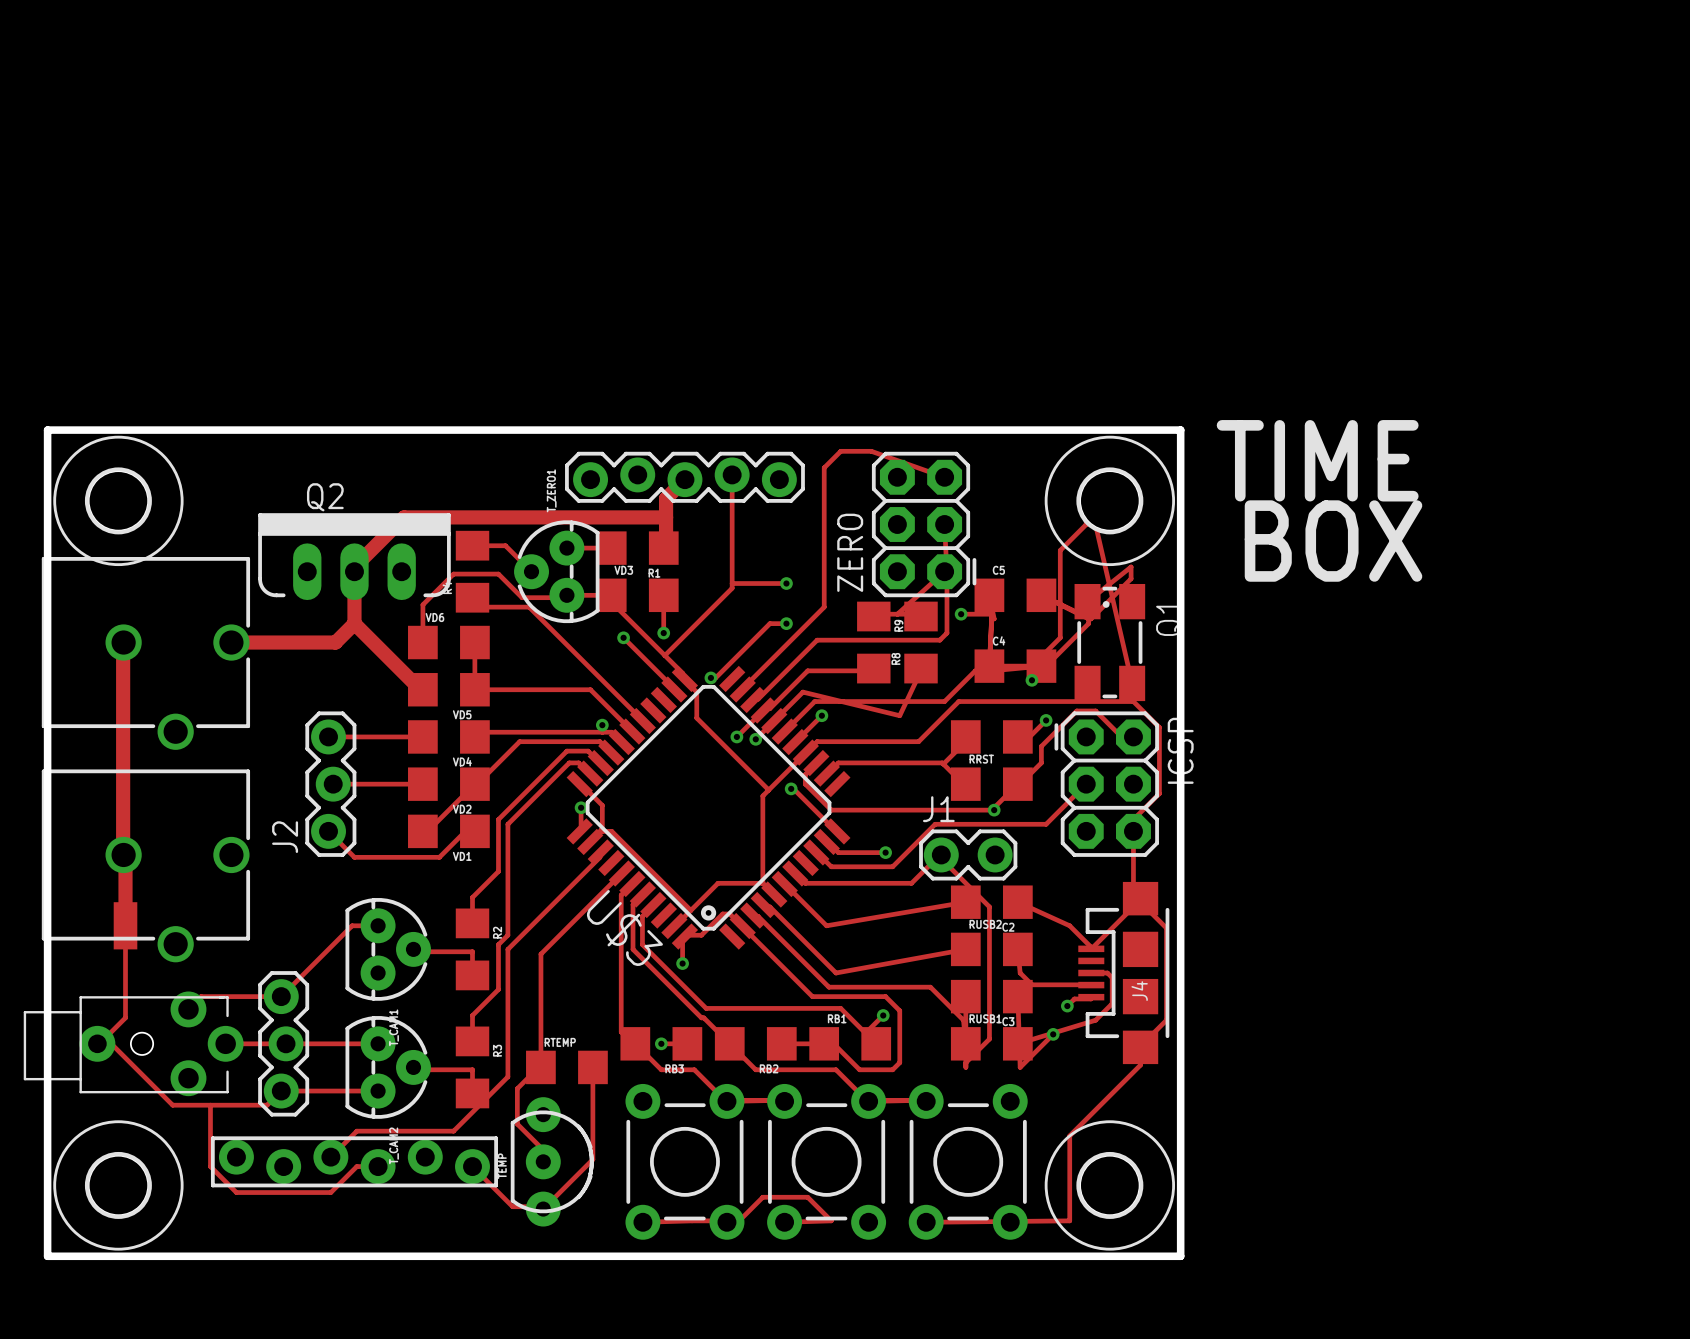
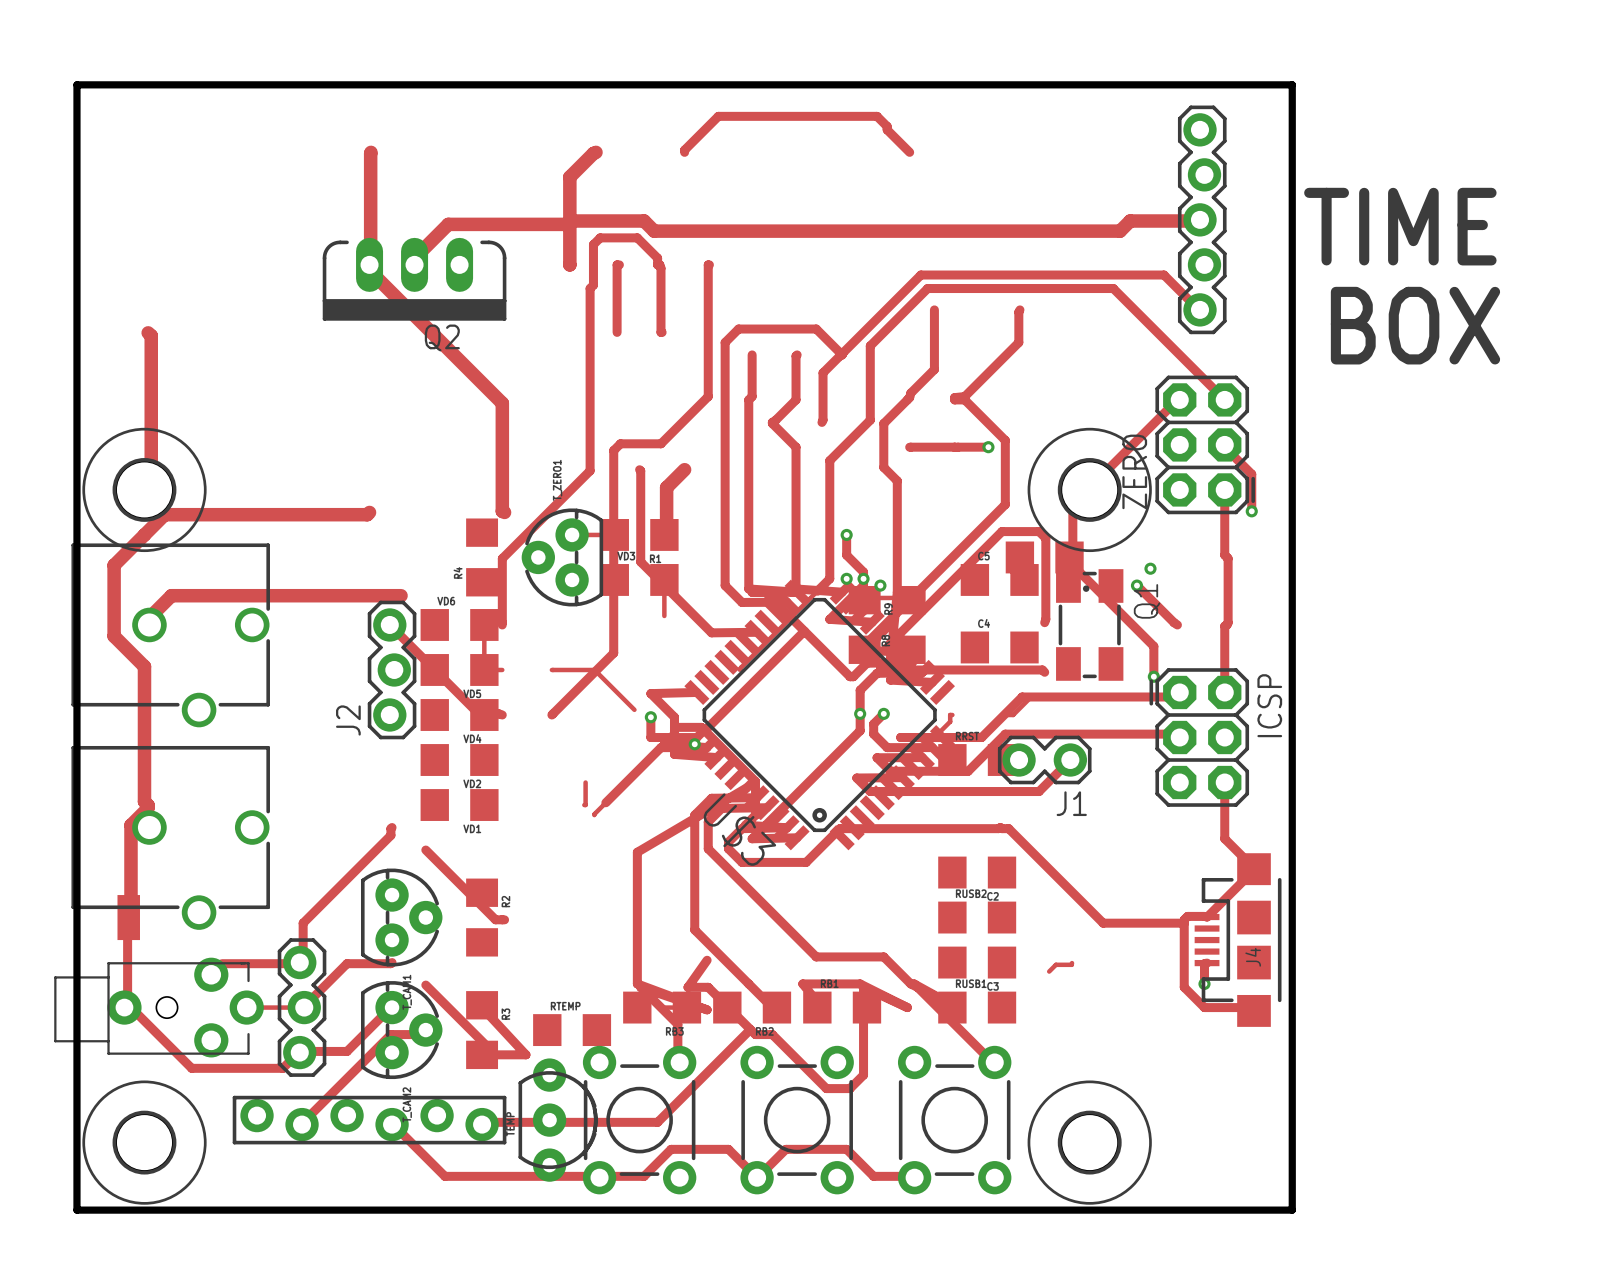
track: none -> (370, 152) (370, 264) (367, 268) (502, 403) (502, 511) (504, 512)
track: none -> (596, 152) (569, 177) (569, 264)
track: none -> (684, 152) (684, 150) (718, 116) (877, 116) (887, 126) (887, 129) (909, 152)
track: none -> (1199, 219) (1130, 221) (1120, 231) (654, 231) (644, 221) (569, 221)
part: none -> (1202, 219)
track: none -> (569, 224) (448, 224) (414, 258) (414, 264)
track: none -> (619, 264) (617, 264) (617, 332)
track: none -> (709, 264) (708, 396) (660, 443) (620, 443) (613, 450) (613, 653) (551, 714)
track: none -> (934, 309) (934, 369) (883, 423) (883, 467) (897, 480) (897, 592) (892, 642)
track: none -> (1019, 309) (1018, 342) (964, 396) (954, 397) (954, 399) (964, 399) (1005, 440) (1005, 504) (860, 649) (902, 652)
track: none -> (1199, 309) (1163, 275) (920, 275) (842, 354)
track: none -> (662, 332) (660, 268) (659, 264) (657, 264) (657, 258) (637, 237) (600, 237) (593, 244) (593, 285) (590, 288) (590, 470) (502, 558) (502, 624)
track: none -> (148, 332) (151, 335) (151, 501) (164, 514)
track: none -> (752, 354) (752, 396) (748, 399) (748, 588) (797, 592) (752, 592) (765, 592) (850, 676) (853, 676) (866, 663) (912, 662)
track: none -> (797, 354) (796, 399) (772, 422) (796, 447) (796, 588) (842, 592)
track: none -> (842, 354) (816, 329) (738, 329) (725, 342) (725, 585) (742, 602) (787, 602)
track: none -> (842, 354) (823, 372) (821, 422)
track: none -> (1179, 399) (1177, 399) (1072, 504) (1072, 555) (1069, 557) (1069, 561) (1153, 646) (1153, 676)
board edge: (47, 430) (1180, 430) (1180, 1256) -> (76, 422) (76, 84) (1292, 84) (1292, 1210) (1157, 1210)
track: none -> (1224, 444) (1224, 447) (1251, 474) (1251, 511)
track: none -> (909, 447) (988, 447)
via: none -> (988, 447)
text position: TIME (1317, 460) -> TIME (1400, 226)
track: (732, 474) (732, 588) (664, 655) -> none
part: (684, 477) -> none
track: (944, 477) (871, 451) (840, 451) (824, 467) (824, 607) -> (1224, 399) (1113, 288) (927, 288) (870, 345) (870, 420) (829, 460) (829, 578) (817, 591)
track: none -> (639, 469) (640, 561) (711, 632) (757, 632)
track: none -> (1224, 489) (1224, 555) (1228, 558) (1228, 622) (1224, 626) (1224, 692)
track: (666, 517) (404, 517) (354, 566) (354, 623) -> none
via: none -> (1251, 511)
track: none -> (369, 512) (367, 514) (164, 514)
ZERO position: (924, 524) -> (1205, 444)
track: (944, 524) (946, 633) (939, 640) (817, 640) (758, 699) (753, 699) -> none
track: none -> (164, 514) (114, 565) (114, 636) (144, 666) (144, 801) (148, 805) (147, 808) (130, 825) (130, 906) (128, 906)
text position: BOX (1333, 541) -> BOX (1415, 325)
track: (472, 545) (505, 545) (531, 571) -> none
track: none -> (846, 534) (846, 555) (863, 572) (863, 585) (829, 619) (872, 622)
via: none -> (846, 534)
Q2 rotation: 0° (354, 556) -> 180° (414, 279)
Q2 position: (354, 556) -> (414, 279)
track: (944, 571) (897, 614) -> none
track: (732, 583) (786, 583) -> none
via: (786, 583) -> none
via: none -> (1150, 568)
via: none -> (846, 578)
via: none -> (863, 578)
track: (989, 595) (994, 618) (991, 616) (989, 666) (991, 614) (961, 614) -> none
track: (472, 597) (479, 607) (529, 607) (642, 721) -> none
via: none -> (880, 585)
track: (1087, 601) (1131, 566) (1131, 578) (1090, 618) (1041, 595) (1088, 618) (1088, 623) (1031, 680) -> none
track: none -> (1136, 585) (1177, 624)
via: none -> (1136, 585)
track: none -> (401, 595) (171, 595) (144, 623)
via: (961, 614) -> none
track: (354, 623) (420, 689) (422, 689) -> none
track: (354, 623) (335, 642) (231, 642) -> none
track: (786, 623) (769, 623) (715, 677) (710, 677) -> none
via: (786, 623) -> none
via: (663, 633) -> none
track: (623, 637) (674, 689) -> none
via: (623, 637) -> none
track: none -> (1044, 622) (1045, 538) (1039, 531) (1001, 531) (890, 642) (890, 659) (880, 669) (922, 672) (877, 673) (860, 690) (860, 730) (752, 838) (797, 837)
track: (123, 642) (123, 850) (123, 854) (125, 854) (125, 913) -> none
track: none -> (389, 624) (478, 713) (502, 714)
track: (422, 642) (422, 604) (453, 574) (498, 574) (522, 597) (611, 595) (611, 602) (682, 673) (682, 677) (696, 692) (696, 718) (768, 790) -> none
track: none -> (804, 631) (704, 730)
track: (873, 668) (873, 670) (807, 670) (769, 708) (765, 708) (736, 736) -> none
track: (921, 668) (899, 715) (802, 692) (755, 739) -> none
via: (710, 677) -> none
via: (1031, 680) -> none
track: (1132, 683) (1086, 484) (1086, 524) (1060, 550) (1060, 637) (1031, 666) (994, 666) (991, 668) (1041, 666) (975, 670) (944, 701) (814, 701) (784, 731) -> none
track: (493, 689) (545, 689) -> none
track: none -> (1044, 672) (1042, 669) (900, 669) (890, 680) (932, 682)
via: none -> (1153, 676)
track: none -> (1179, 692) (1174, 696) (1022, 696) (981, 737) (900, 737) (942, 737)
track: (821, 715) (795, 742) -> none
via: (821, 715) -> none
via: (1046, 720) -> none
via: (602, 725) -> none
via: none -> (860, 713)
track: none -> (883, 713) (873, 724) (873, 734) (887, 747) (932, 747)
via: none -> (883, 713)
track: (328, 736) (422, 736) -> none
track: (474, 736) (481, 732) (611, 732) (621, 742) -> none
via: (736, 736) -> none
part position: (991, 736) -> (1044, 557)
track: (1133, 736) (1121, 736) (1095, 710) (1076, 710) (1041, 746) (1041, 762) (991, 810) (831, 810) (805, 784) (805, 774) (816, 763) -> none
track: none -> (650, 717) (650, 737) (696, 737)
via: none -> (650, 717)
via: (755, 739) -> none
track: none -> (674, 727) (701, 727) (755, 781) (755, 815) (745, 825) (787, 827) (742, 828) (728, 842) (728, 848) (742, 862) (806, 862) (839, 828) (1008, 828) (1103, 923) (1184, 923)
track: (611, 752) (599, 741) (519, 741) (427, 831) (422, 831) -> none
track: none -> (1179, 737) (1174, 734) (1005, 734) (968, 771) (890, 771) (877, 757) (922, 757)
track: (600, 763) (588, 751) (566, 751) (498, 819) (498, 871) (472, 897) (472, 923) -> none
track: none -> (694, 744) (684, 744) (674, 754) (716, 757)
via: none -> (694, 744)
track: (590, 773) (578, 762) (569, 762) (507, 824) (507, 935) (498, 944) (498, 989) (472, 1015) (472, 1041) -> none
track: (826, 773) (838, 762) (942, 762) (963, 784) (965, 784) -> none
J2 position: (330, 784) -> (392, 669)
track: (333, 784) (422, 784) -> none
track: (579, 784) (602, 805) (602, 829) -> (696, 692) (650, 693) (674, 717) (674, 734) (664, 744) (706, 747) (660, 747) (605, 802)
track: (1086, 784) (1046, 824) (935, 824) (892, 866) (831, 866) (816, 852) -> none
track: none -> (1070, 760) (1039, 791) (870, 791) (856, 778) (902, 777)
ICSP position: (1106, 784) -> (1199, 737)
track: (791, 788) (793, 788) (837, 831) -> none
via: (791, 788) -> none
via: (581, 807) -> none
U$3 position: (708, 807) -> (819, 714)
track: none -> (1224, 782) (1224, 838) (1254, 869) (1207, 916) (1187, 916) (1184, 919) (1184, 987) (1204, 1007) (1251, 1007) (1254, 1010)
J1 name position: J1 (938, 809) -> J1 (1071, 803)
via: (994, 810) -> none
track: none -> (746, 787) (637, 852) (637, 983) (707, 1009) (640, 987) (677, 1024) (677, 1061) (679, 1062)
track: none -> (757, 797) (711, 798) (694, 815) (694, 929) (772, 1007)
track: (601, 830) (611, 831) (690, 910) -> none
track: (328, 831) (354, 857) (439, 857) (465, 831) (474, 831) -> none
track: none -> (767, 807) (721, 808) (708, 821) (708, 848) (816, 956) (883, 956) (910, 983) (956, 1007) (914, 983) (991, 1061) (994, 1062)
track: (826, 841) (838, 852) (885, 852) -> none
track: (600, 852) (599, 857) (507, 949) (507, 1076) (453, 1131) (356, 1131) (330, 1157) -> none
via: (885, 852) -> none
J1 position: (968, 854) -> (1044, 760)
track: (621, 873) (540, 954) (540, 1067) (538, 1067) (517, 1088) (517, 1124) (543, 1150) (543, 1161) -> none
track: (795, 873) (805, 883) (911, 883) (941, 854) (939, 857) (989, 906) (989, 1039) (965, 1062) (965, 1067) (965, 996) -> none
track: none -> (425, 850) (495, 919) (504, 919)
track: (762, 883) (762, 795) (817, 741) (918, 741) (958, 701) (1133, 701) (1159, 727) (1159, 793) (1133, 819) (1133, 890) (1140, 897) (1140, 902) (1166, 928) (1166, 1020) (1140, 1046) (1140, 1065) (1069, 1135) (1069, 1220) (926, 1222) -> (392, 1124) (444, 1176) (644, 1176) (671, 1149) (728, 1149) (757, 1177) (785, 1149) (846, 1149) (873, 1176) (914, 1177)
track: (762, 883) (718, 883) (674, 926) -> none
track: (632, 884) (621, 895) (621, 1032) (661, 1069) (694, 1069) (725, 1100) (772, 1100) (726, 1101) -> none
track: (784, 884) (826, 925) (965, 902) -> none
track: (642, 894) (633, 904) (633, 949) (755, 1069) (836, 1069) (866, 1100) (913, 1100) (868, 1101) -> none
track: (1140, 899) (1091, 948) (1069, 925) (1017, 902) -> none
track: (653, 905) (642, 916) (642, 944) (706, 1008) (840, 1008) (876, 1043) (866, 1032) (883, 1015) -> none
track: (763, 905) (769, 906) (836, 973) (965, 949) -> none
track: (753, 915) (758, 916) (828, 987) (930, 987) (963, 1020) (965, 1043) -> none
part position: (125, 925) -> (128, 917)
track: (378, 925) (352, 925) (281, 996) (199, 997) -> (392, 827) (390, 835) (303, 923) (303, 960) (299, 963) (222, 963)
track: (125, 937) (125, 1017) (99, 1043) -> (390, 1007) (347, 1051) (299, 1051) (282, 1068) (191, 1068) (130, 1007) (126, 1007)
track: (413, 949) (415, 951) (472, 951) (472, 975) -> none
track: (1017, 949) (1020, 973) (1031, 984) (1091, 985) -> none
track: none -> (128, 928) (127, 1007)
track: (682, 963) (682, 937) (684, 935) (701, 935) (722, 913) (729, 913) (812, 996) (885, 996) (899, 1010) (899, 1062) (892, 1069) (859, 1069) (833, 1043) (781, 1043) -> none
via: (682, 963) -> none
track: (1091, 973) (1107, 973) (1112, 977) (1112, 1003) (1095, 1020) (1017, 1043) -> none
J4 position: (1123, 973) -> (1238, 940)
track: none -> (707, 960) (687, 987) (708, 987) (755, 1034) (772, 1034) (826, 1088) (850, 1088) (863, 1075) (863, 987) (907, 1007) (860, 983) (802, 983) (821, 1007)
track: (1017, 996) (1020, 1067) (1053, 1034) -> none
track: none -> (1207, 963) (1204, 963) (1204, 983)
via: (1067, 1006) -> none
via: (883, 1015) -> none
via: none -> (1204, 983)
track: none -> (425, 985) (495, 1054) (525, 1054) (482, 1007)
via: (1053, 1034) -> none
track: (97, 1043) (106, 1039) (172, 1105) (267, 1105) (281, 1091) (378, 1091) -> none
track: (286, 1043) (376, 1043) -> (304, 1007) (347, 963) (392, 962)
via: (661, 1043) -> none
track: (413, 1067) (415, 1069) (472, 1069) (472, 1093) -> none
track: (592, 1067) (592, 1159) (543, 1209) (543, 1206) (512, 1206) (472, 1166) -> (750, 1029) (657, 1122) (482, 1122) (482, 1124)
track: none -> (414, 1034) (390, 1034) (302, 1124)
track: (210, 1105) (210, 1166) (236, 1192) (330, 1192) (356, 1166) (378, 1166) -> none
part position: (684, 1161) -> (639, 1120)
part position: (826, 1161) -> (797, 1120)
track: (642, 1222) (739, 1220) (762, 1197) (807, 1197) (831, 1220) (784, 1222) -> none

